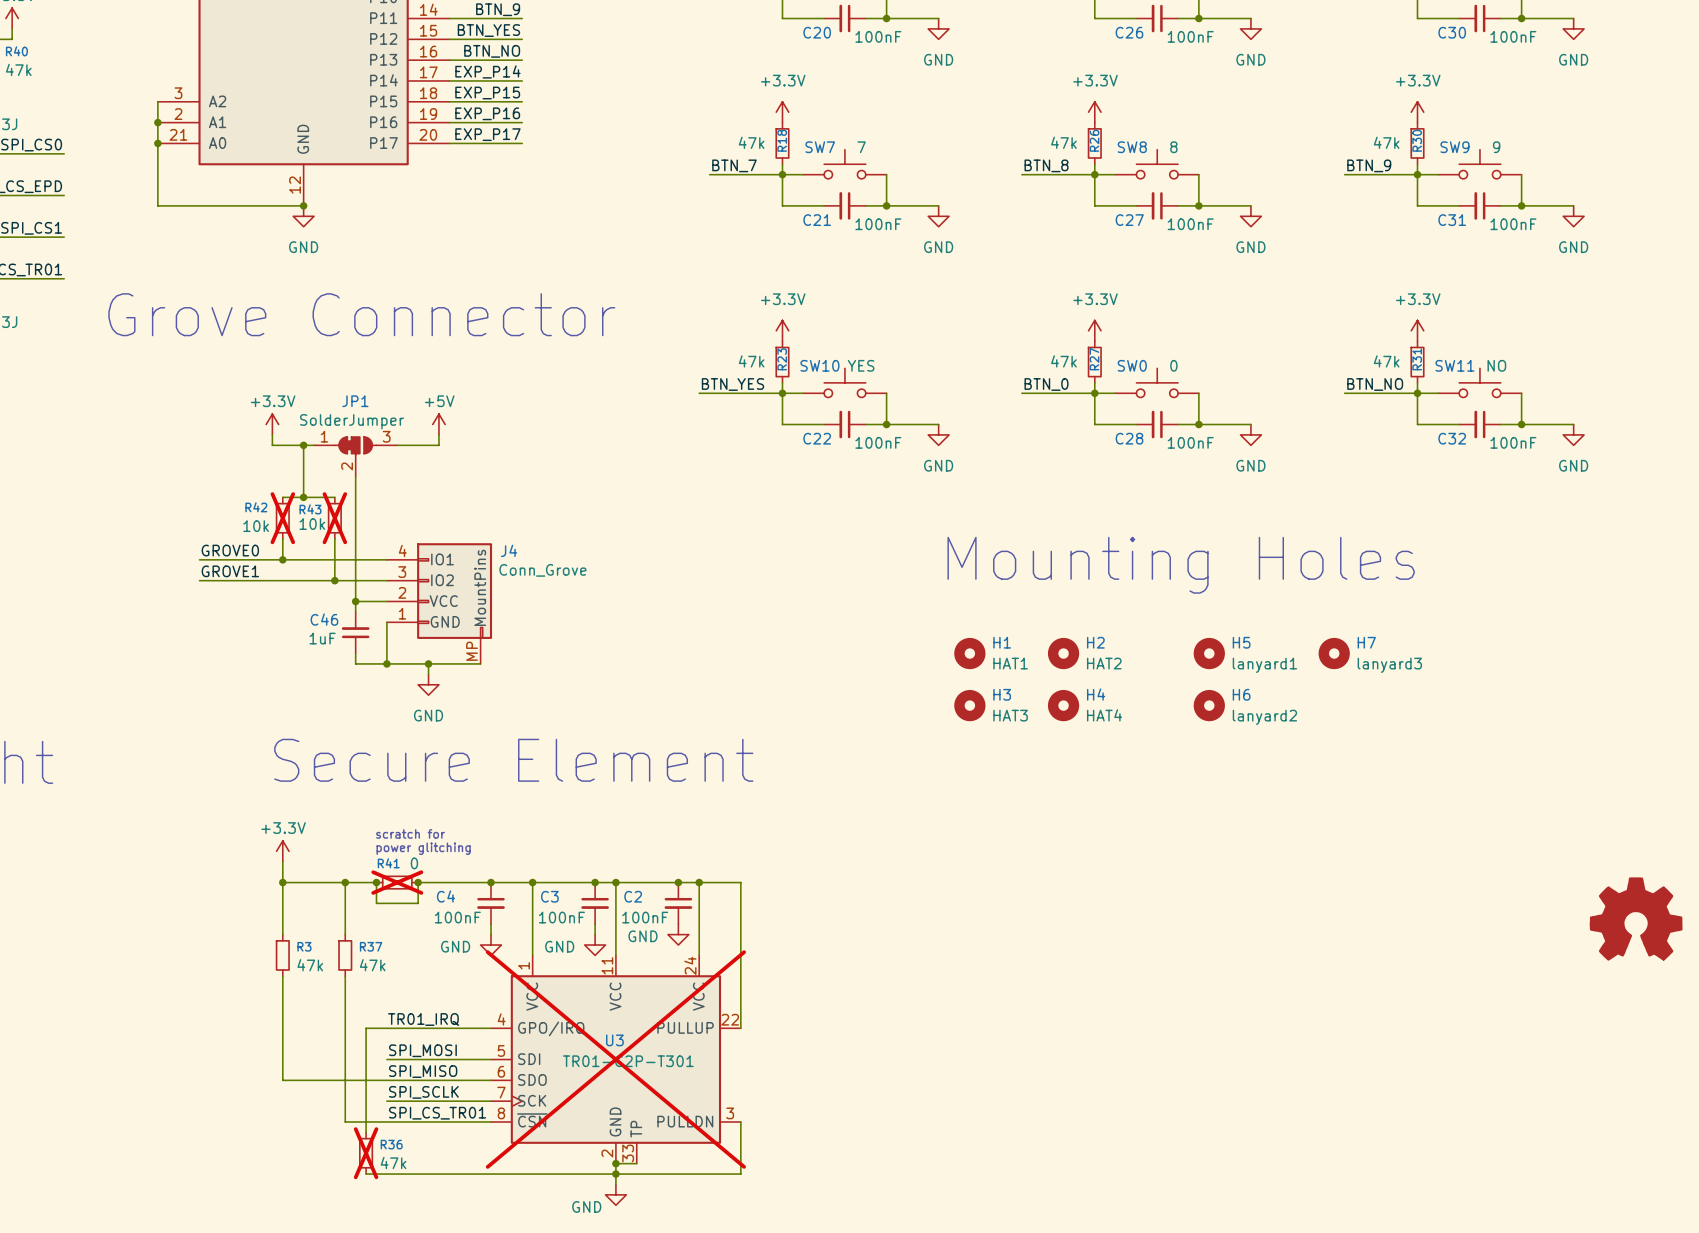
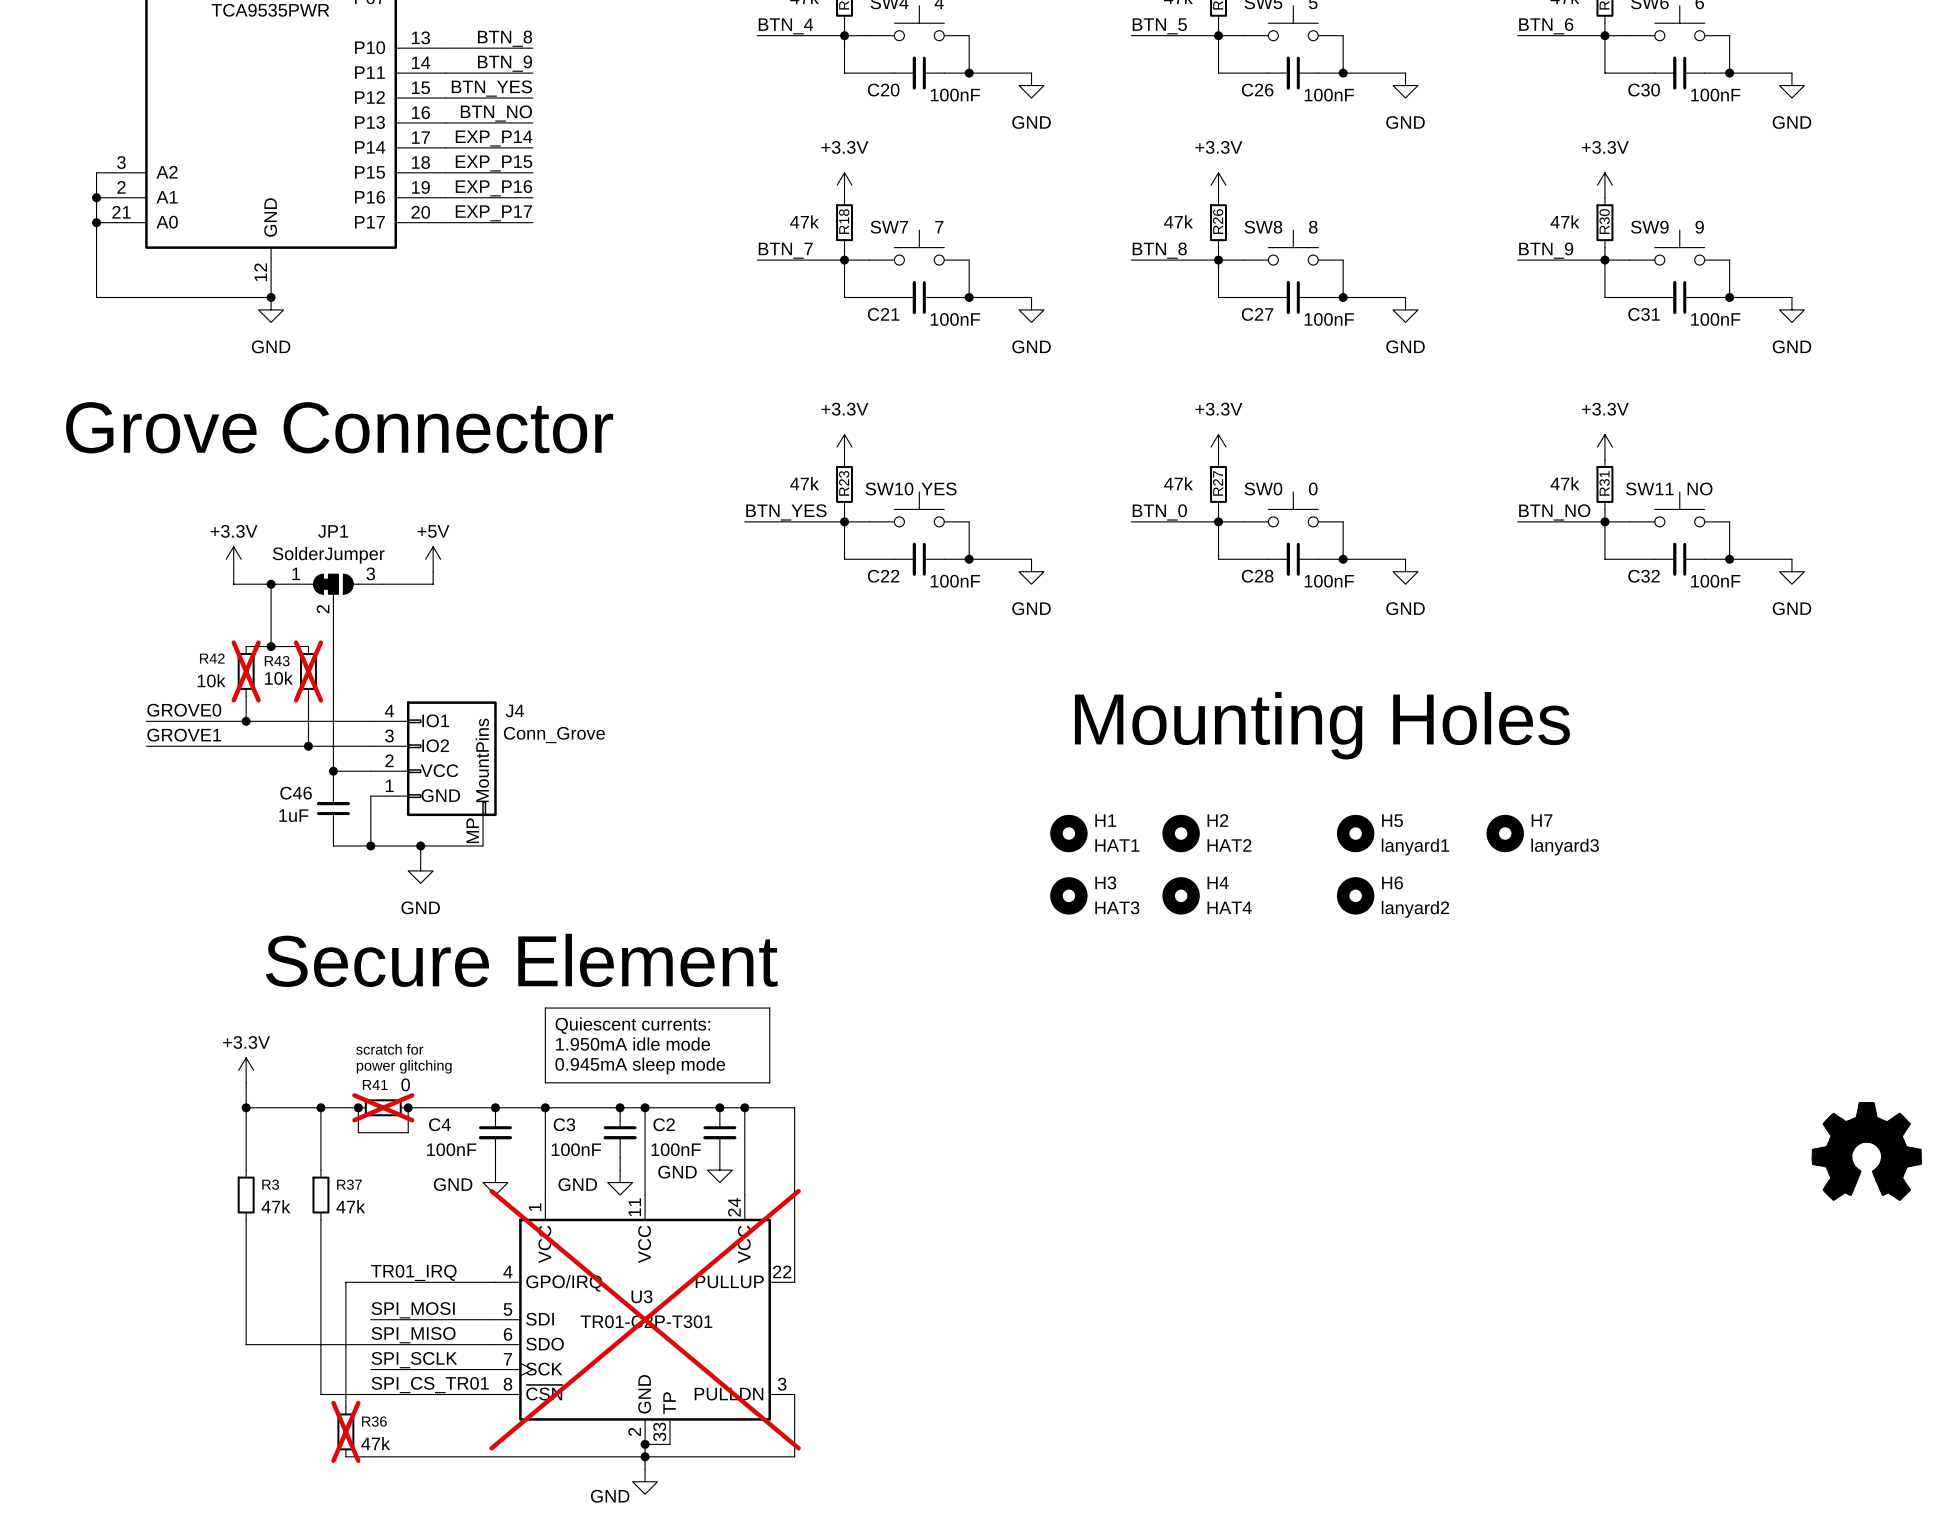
line: none -> (545, 1008) (769, 1008) (769, 1082) (545, 1082) (545, 1008)
text: none -> Quiescent currents: (632, 1025)
text: none -> 1.950mA idle mode (633, 1044)
text: none -> 0.945mA sleep mode (640, 1065)

